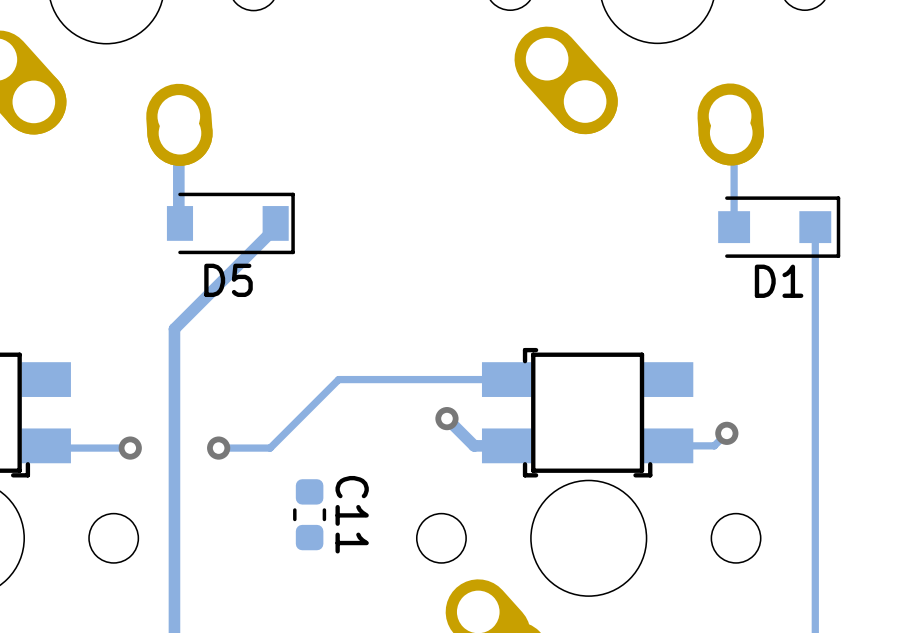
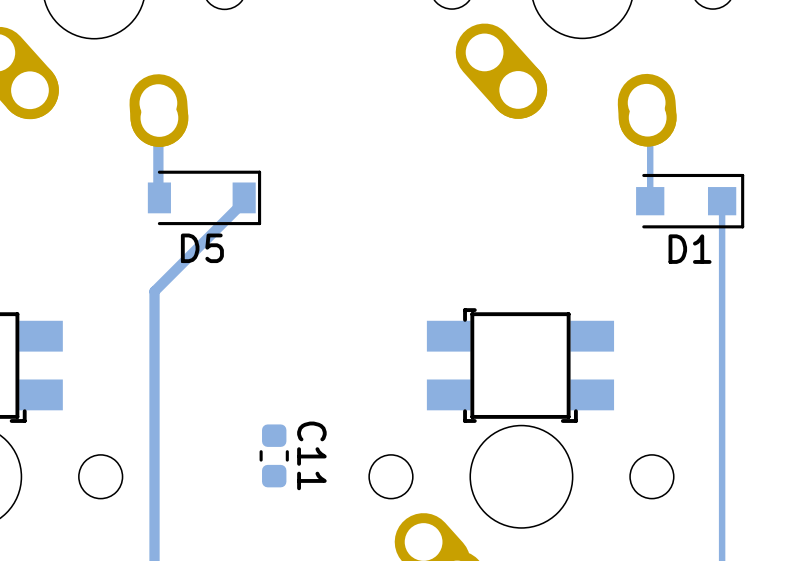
track: (506, 379) (338, 379) (270, 448) (218, 448) -> none
track: (446, 418) (474, 445) (506, 445) -> none
via: (446, 418) -> none
track: (726, 433) (714, 445) (668, 445) -> none
via: (726, 433) -> none
track: (46, 445) (48, 448) (130, 448) -> none
via: (130, 448) -> none
via: (218, 448) -> none

